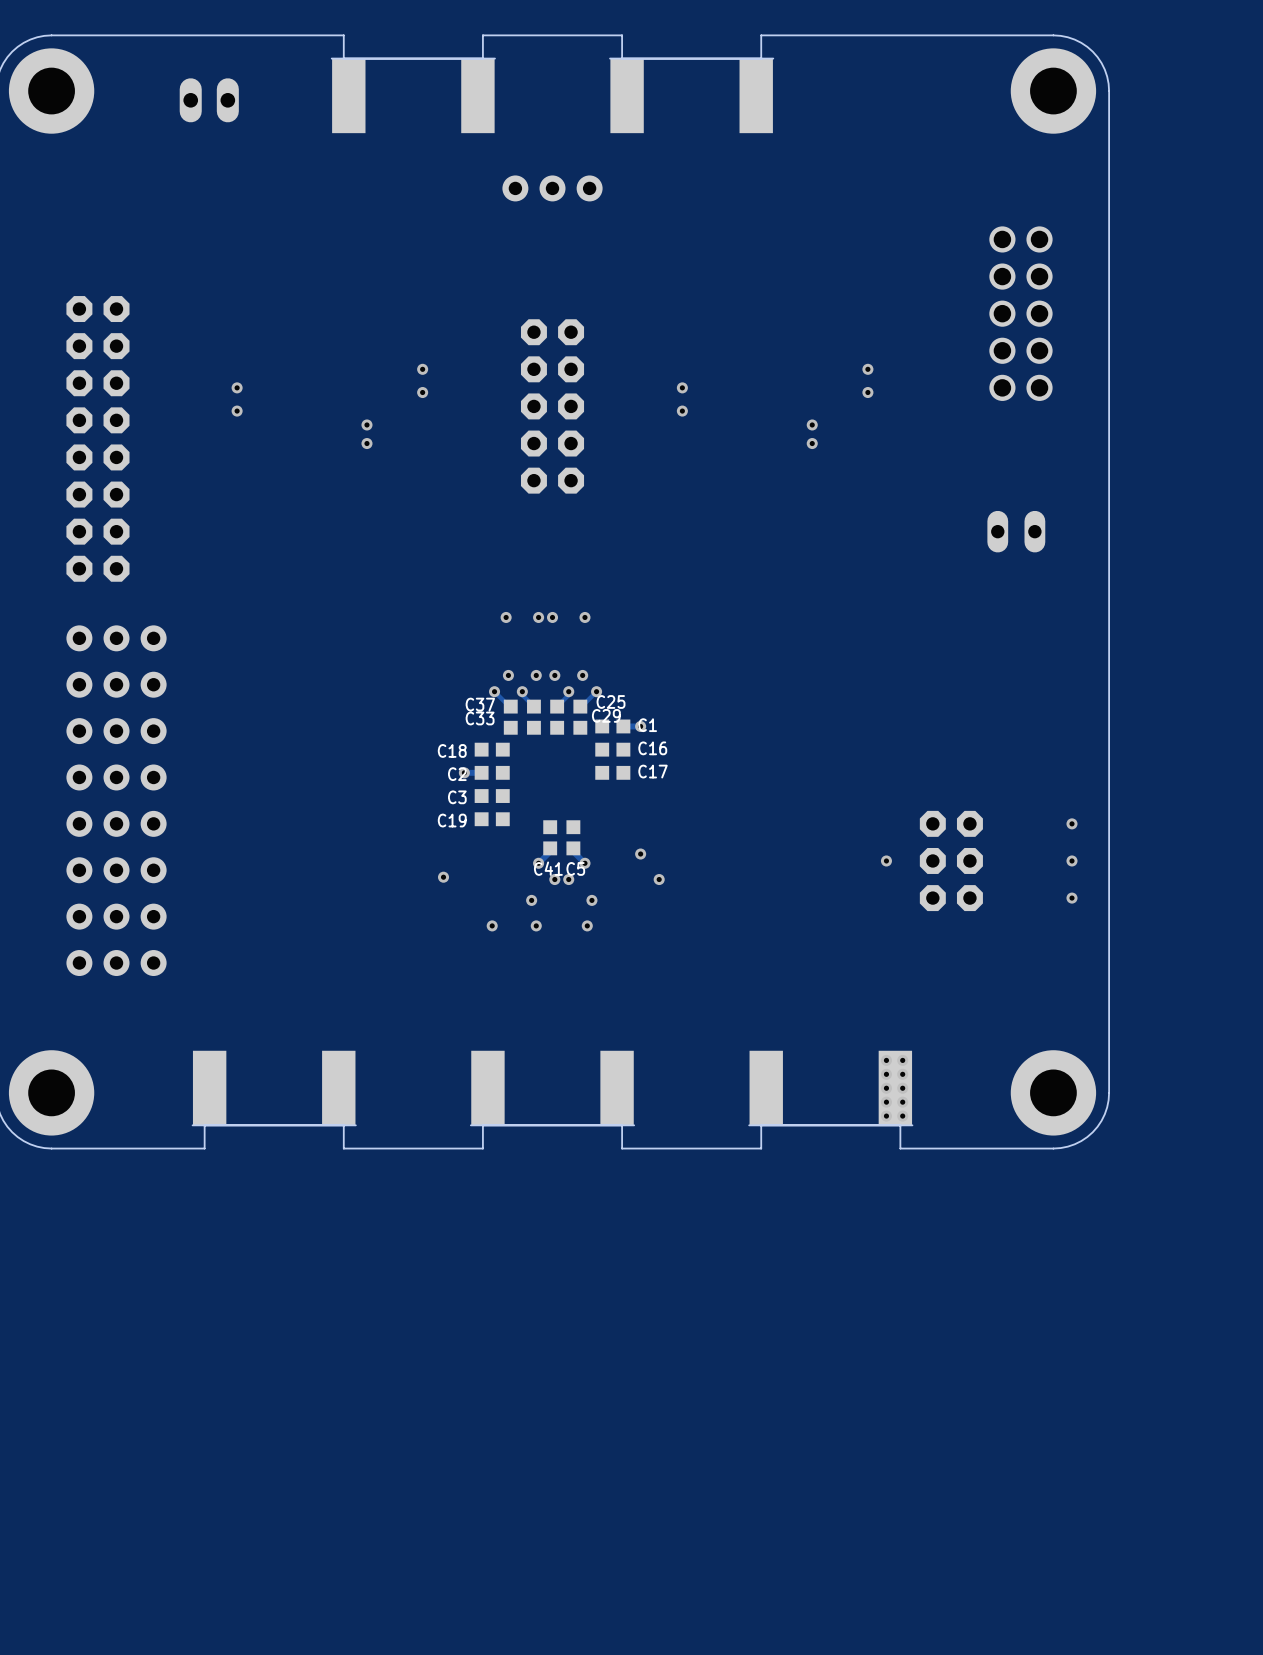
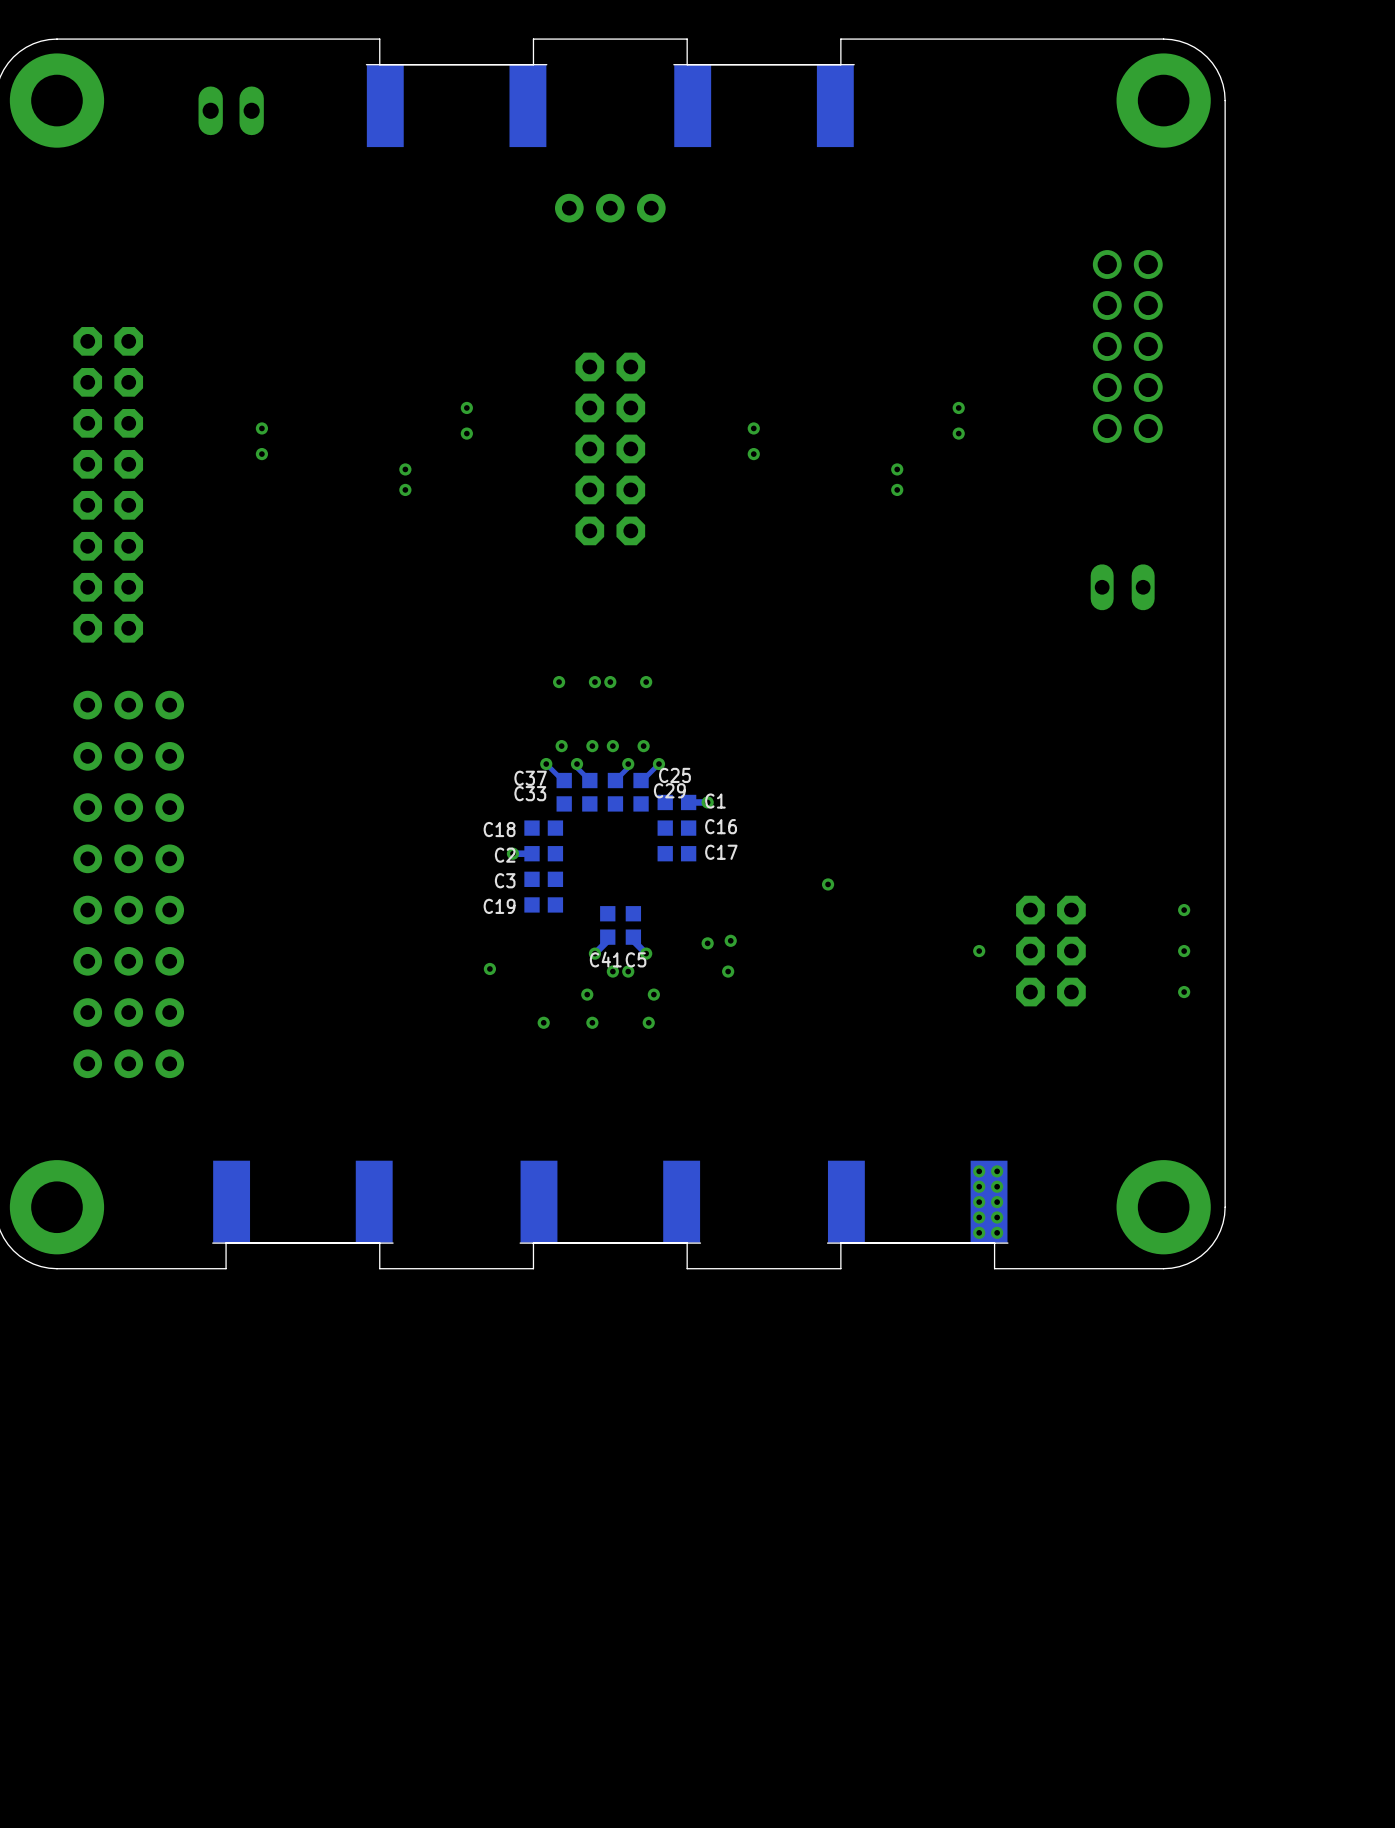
via: none -> (828, 884)
via: none -> (730, 940)

